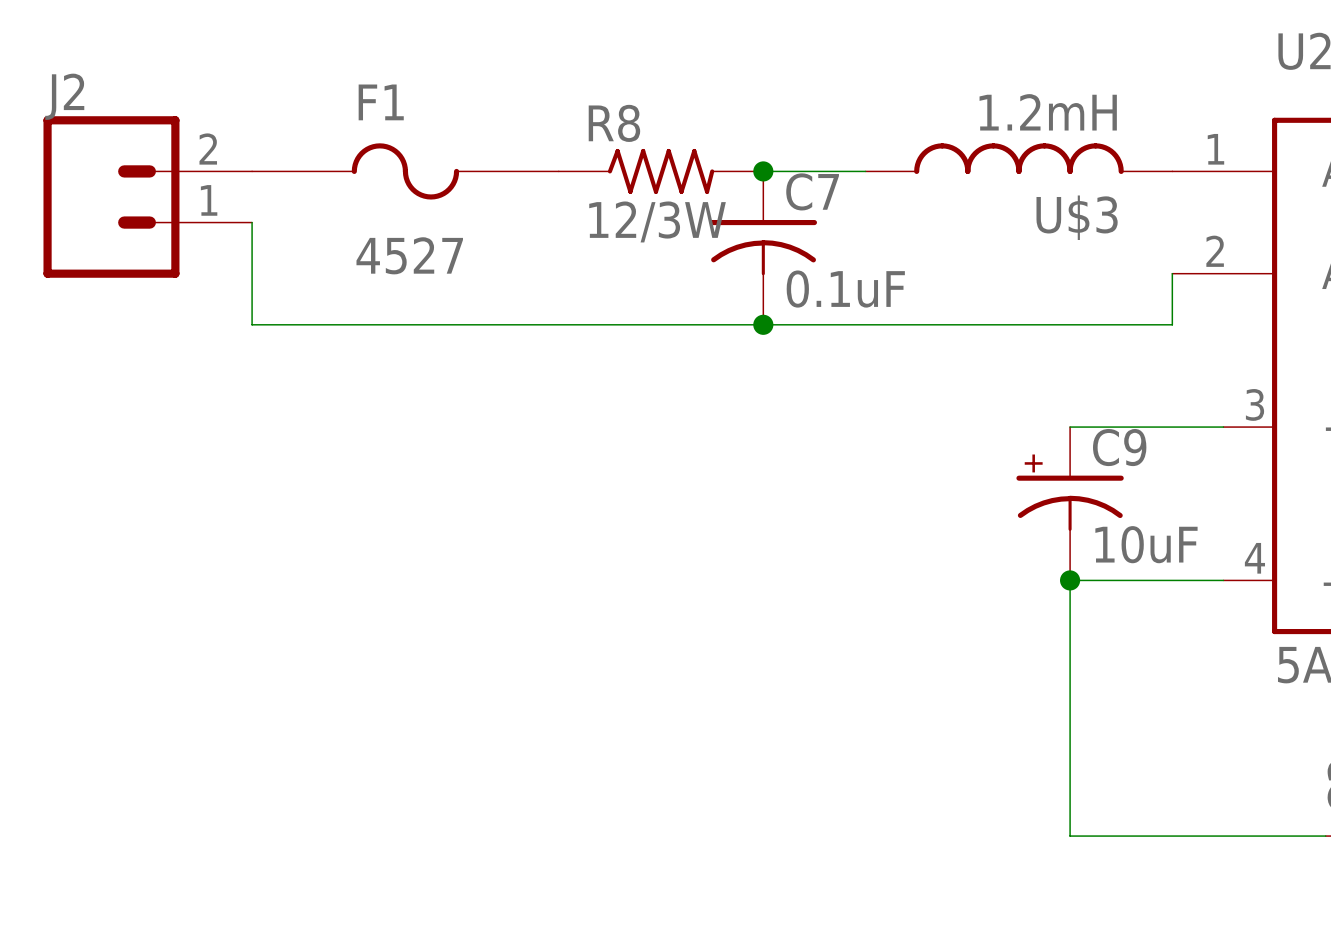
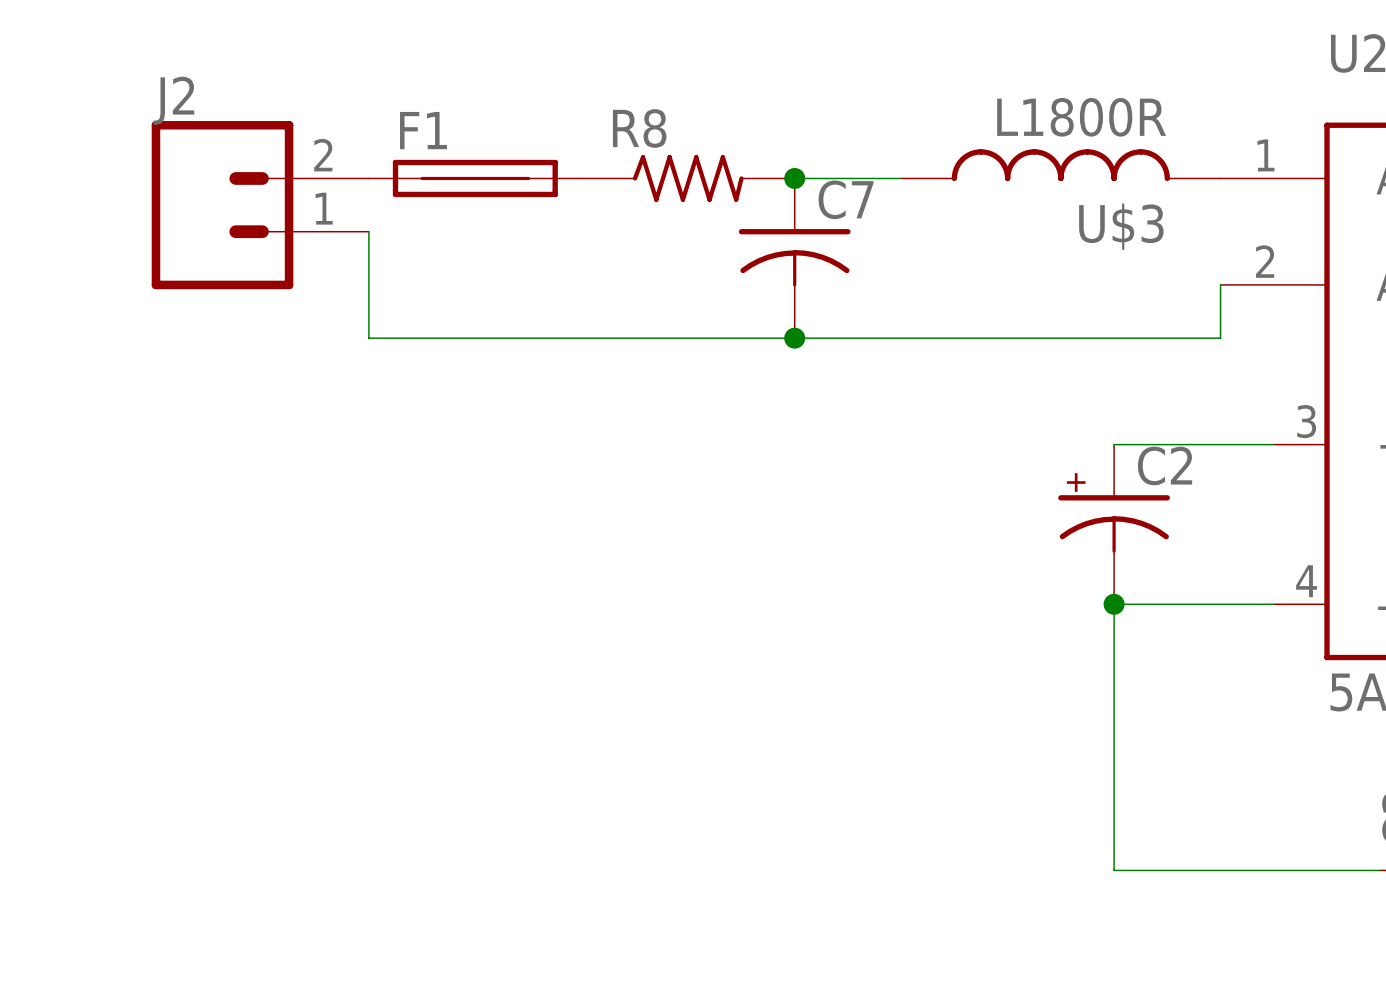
U$3 value: 1.2mH (1048, 112) -> L1800R (1081, 117)
F1 symbol: [252, 143, 559, 200] -> [368, 159, 582, 198]
J2 position: (147, 196) -> (260, 205)
R8 value: 12/3W (657, 221) -> none
wire: (252, 222) (252, 324) (354, 324) -> (368, 231) (368, 338)
F1 value: 4527 (409, 255) -> none
C7 value: 0.1uF (845, 289) -> none
C9 name: C9 (1119, 447) -> C2 (1165, 465)
C9 value: 10uF (1146, 544) -> none

